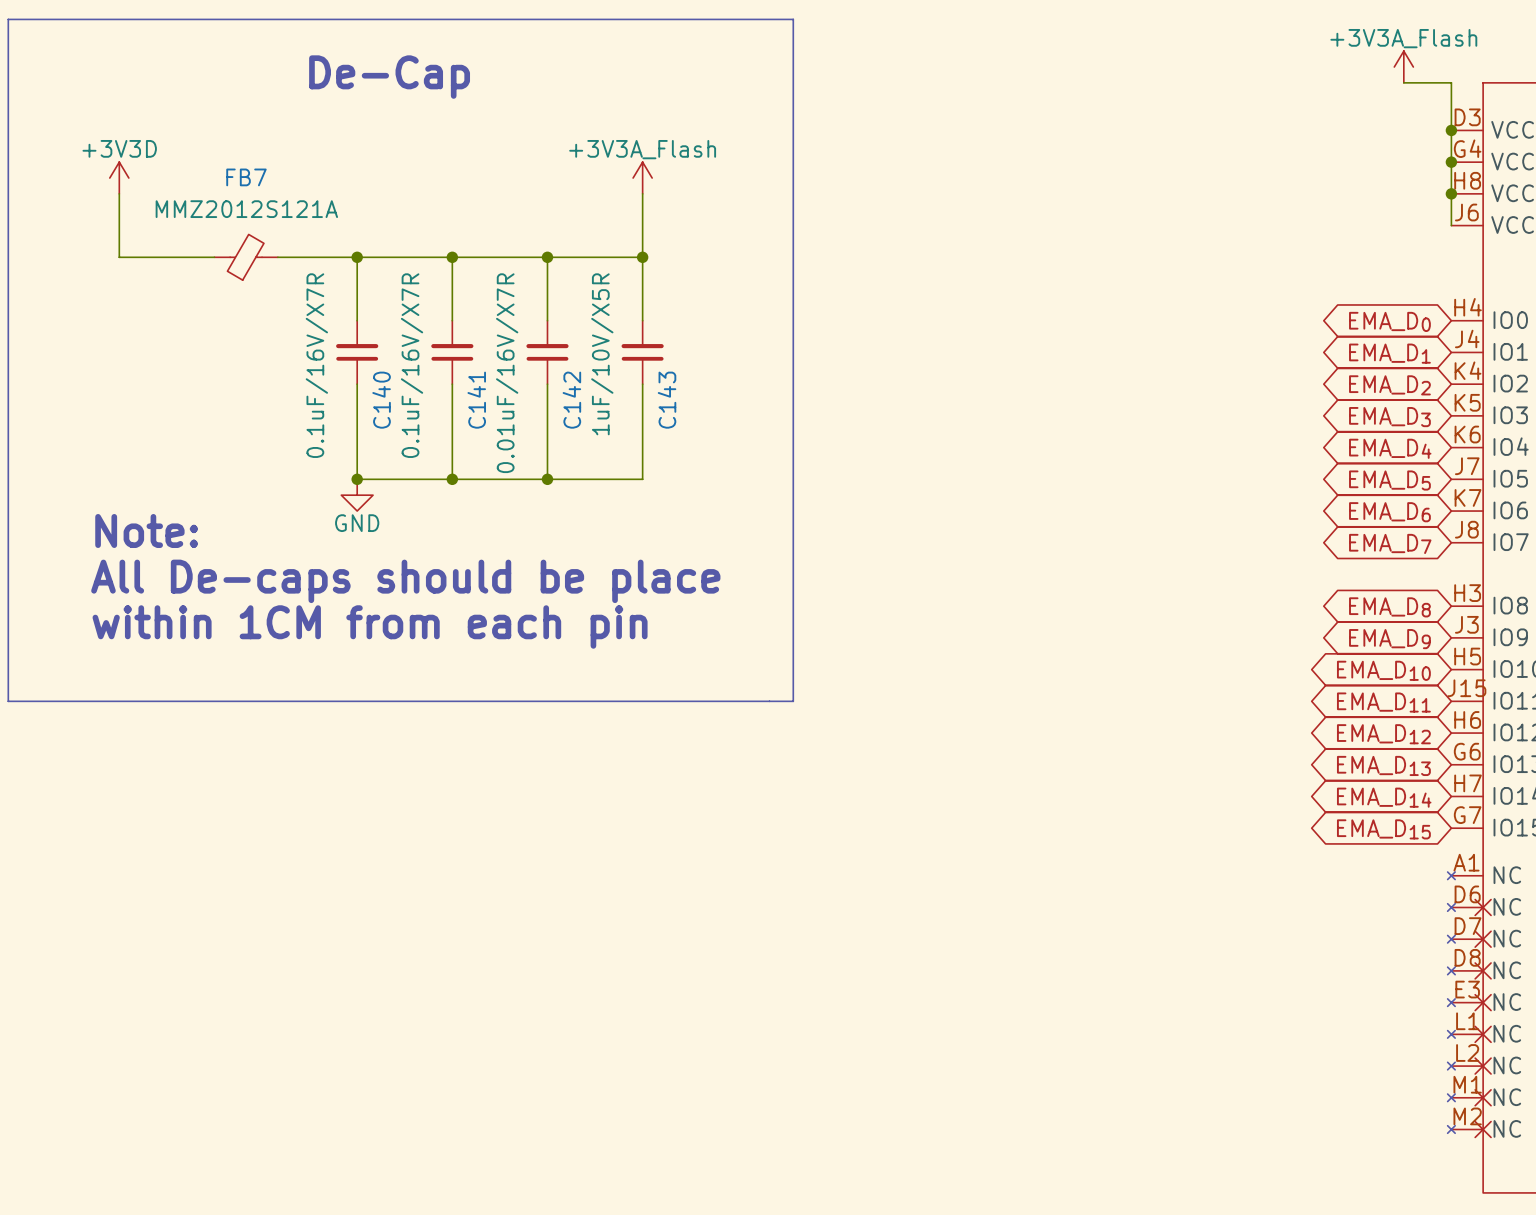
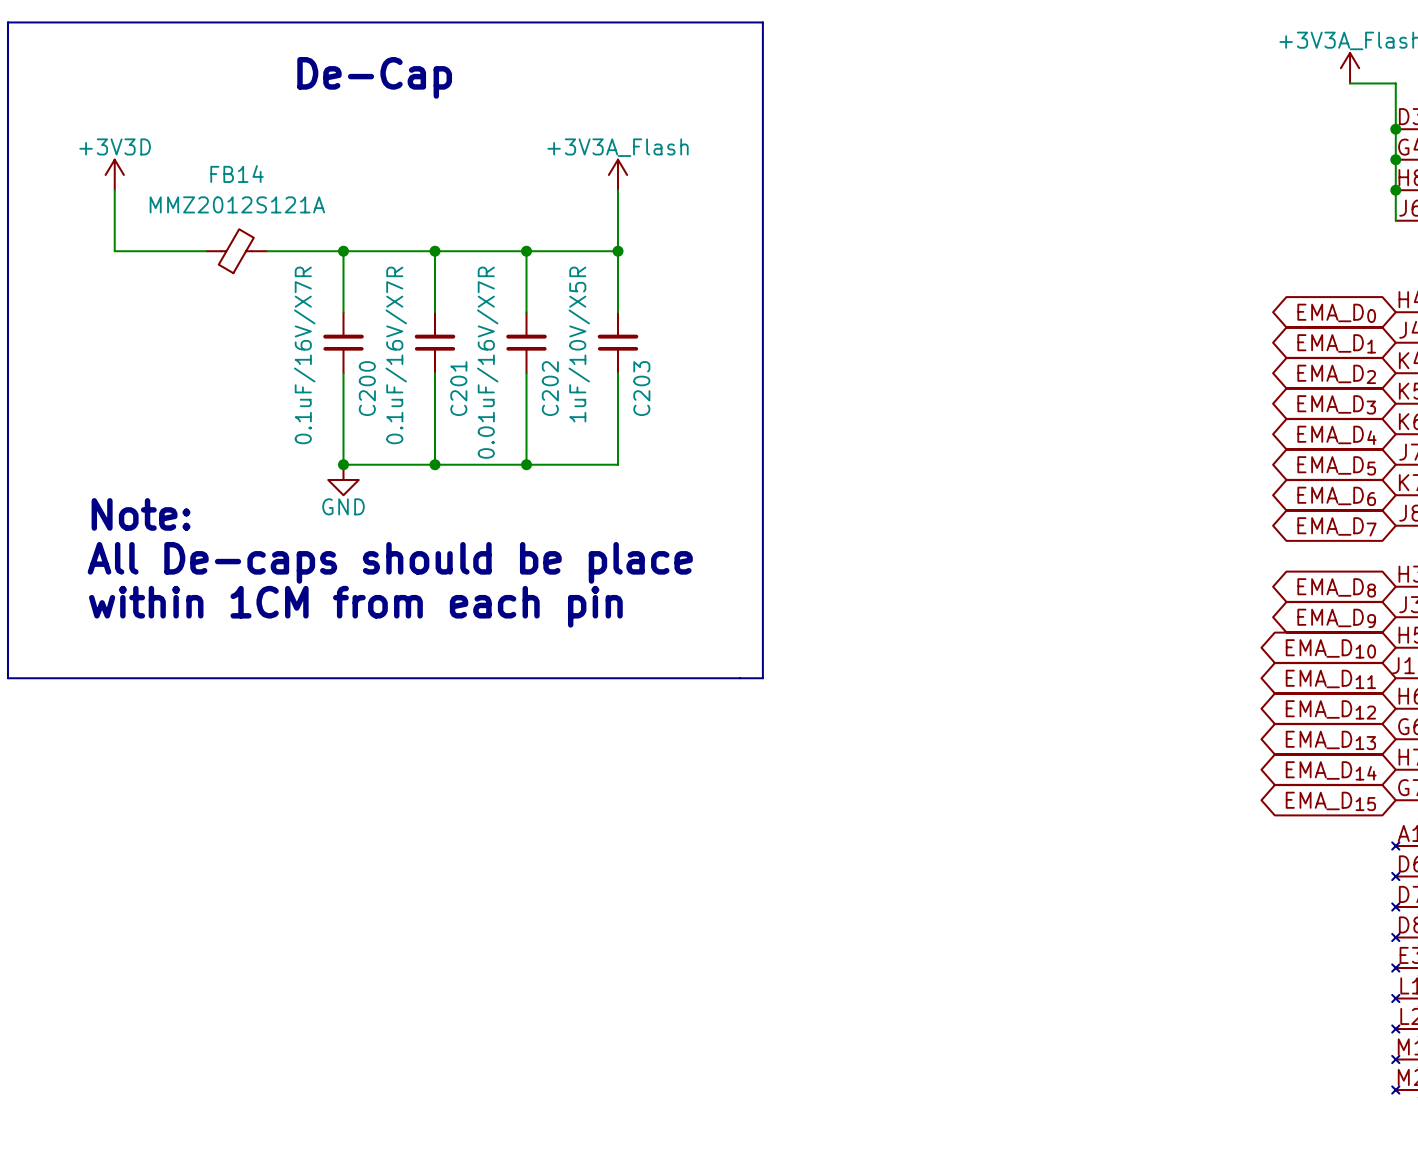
FB7 name: FB7 (246, 177) -> FB14 (237, 174)
C140 name: C140 (381, 400) -> C200 (367, 388)
C141 name: C141 (476, 400) -> C201 (458, 388)
C142 name: C142 (571, 400) -> C202 (550, 388)
C143 name: C143 (667, 400) -> C203 (641, 388)

